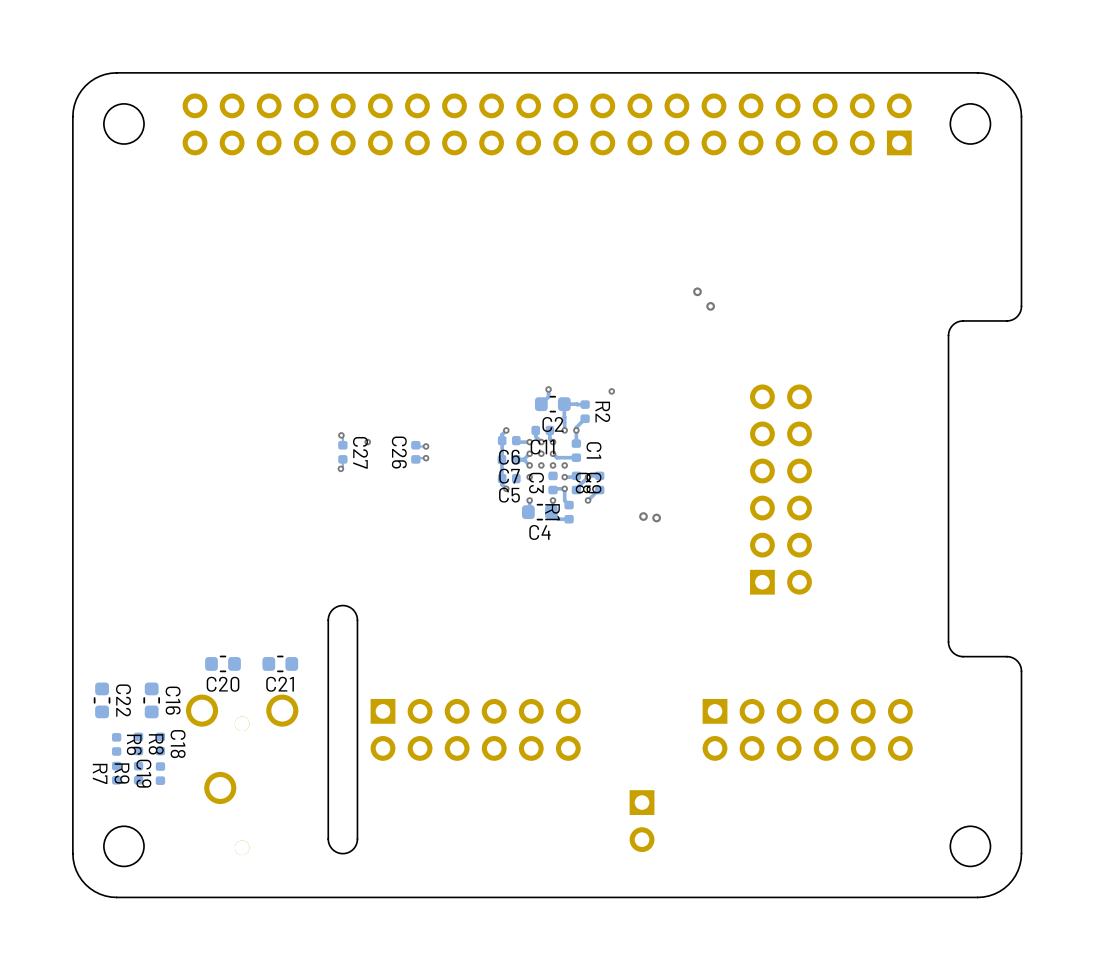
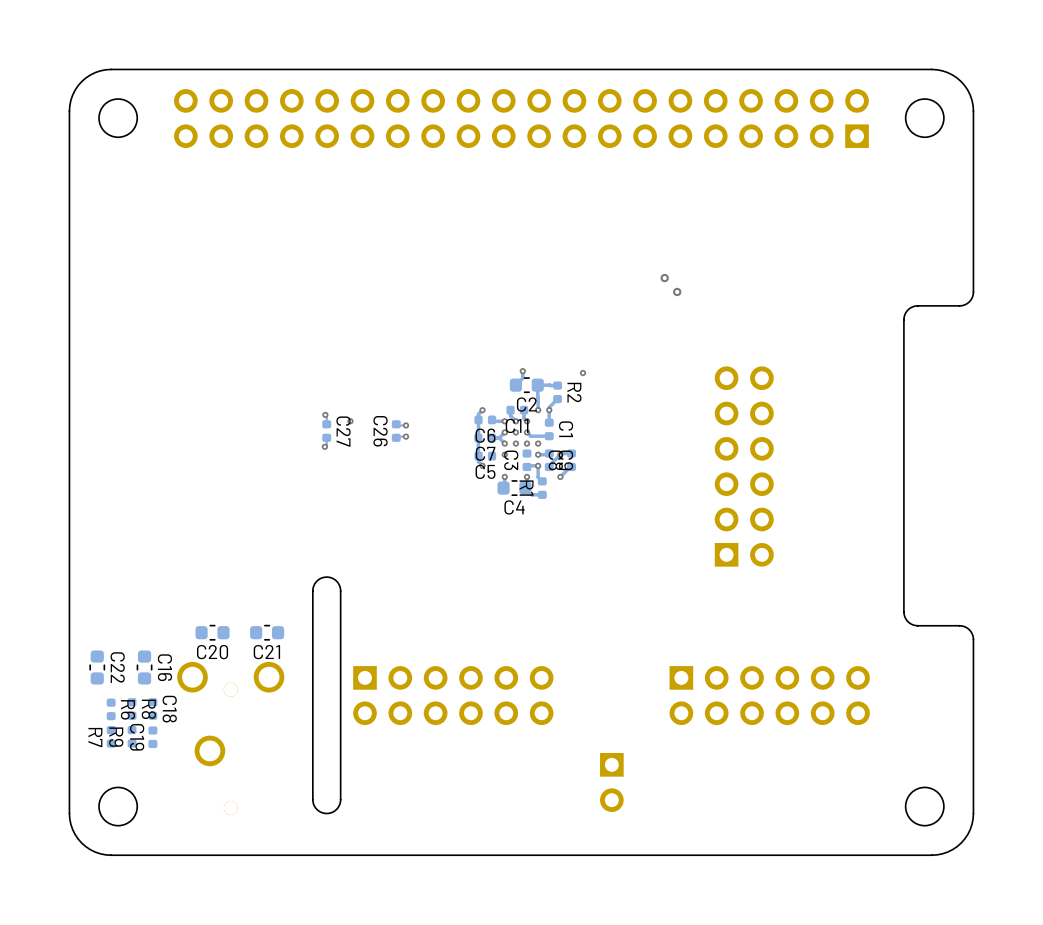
via: (643, 516) -> none
via: (656, 517) -> none

